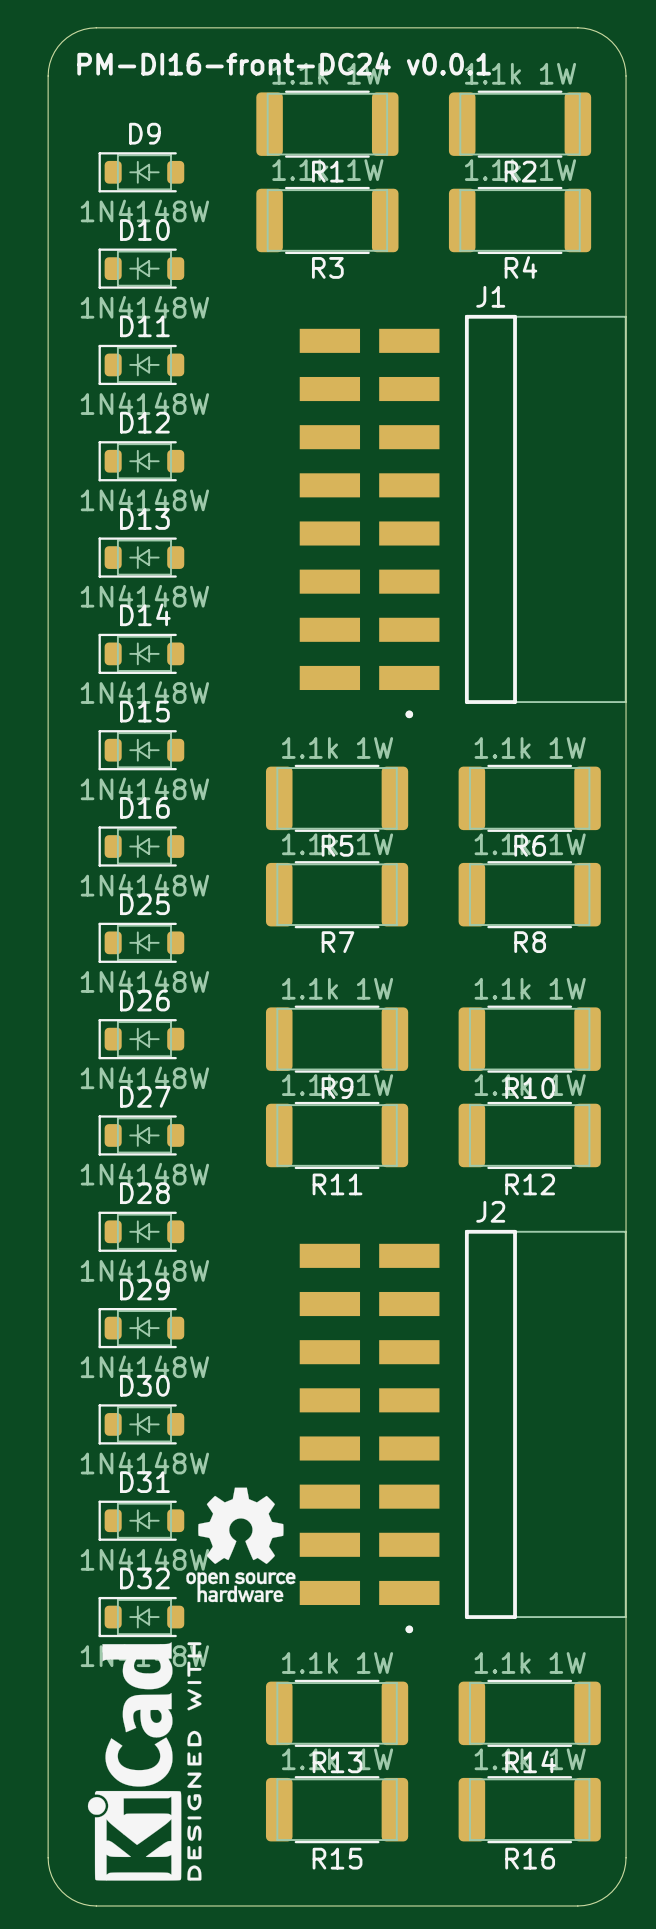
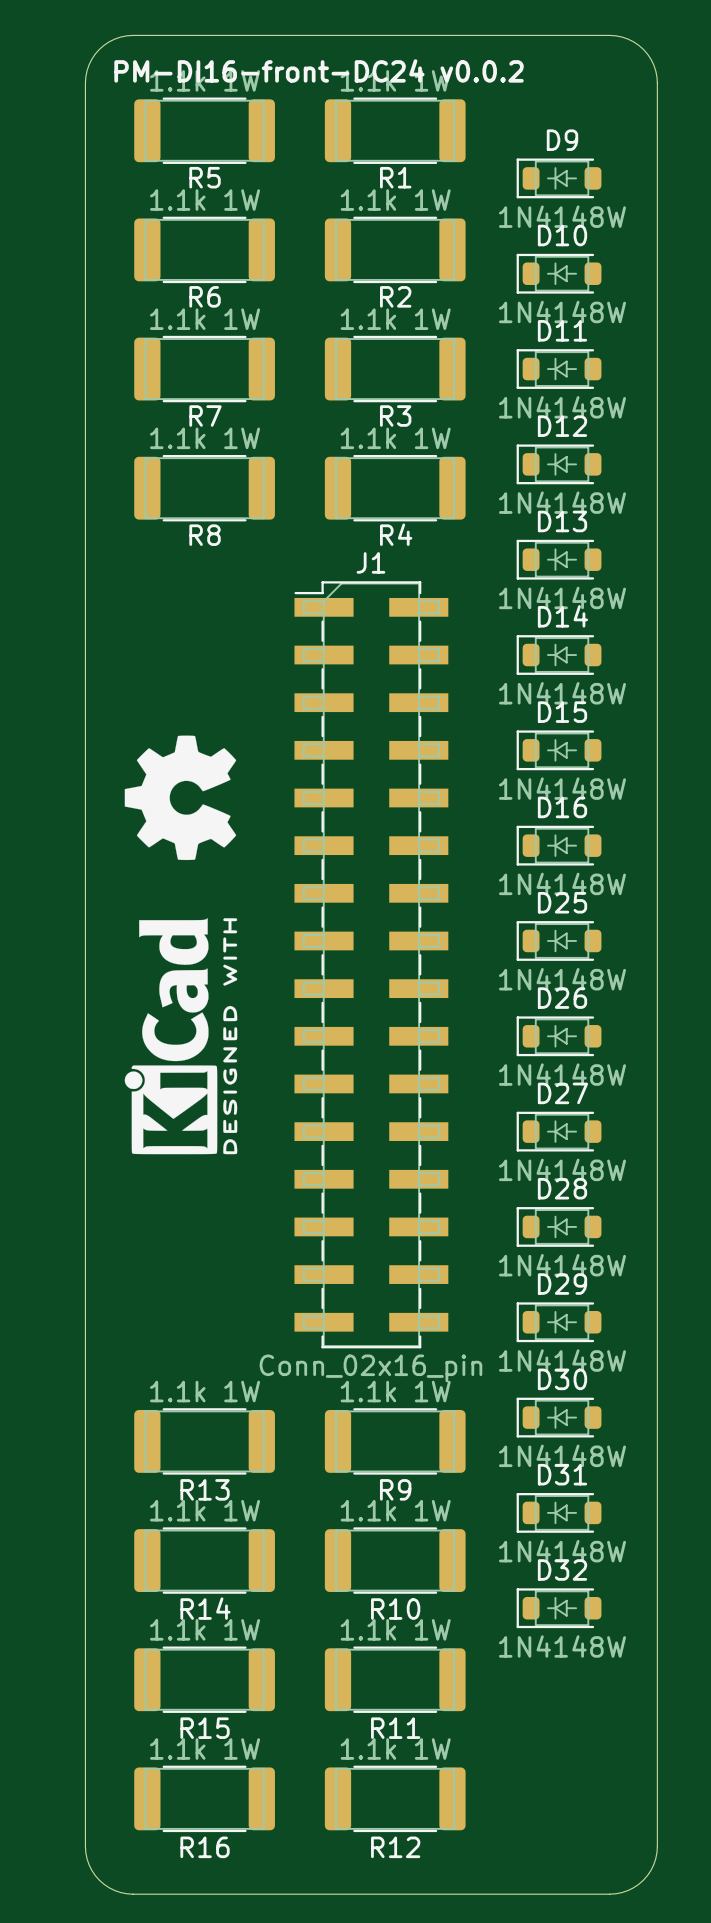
text: PM-DI16-front-DC24 v0.0.1 (284, 63) -> PM-DI16-front-DC24 v0.0.2 (319, 70)
R1 position: (327, 124) -> (395, 130)
R2 position: (520, 124) -> (395, 249)
D9 position: (141, 172) -> (559, 178)
R3 position: (327, 220) -> (395, 369)
R4 position: (520, 220) -> (395, 488)
D10 position: (141, 268) -> (559, 273)
J1 name position: J1 (490, 296) -> J1 (370, 562)
J1 footprint: [299, 314, 627, 719] -> [294, 581, 449, 1349]
D11 position: (141, 364) -> (559, 369)
D12 position: (141, 461) -> (559, 464)
D13 position: (141, 557) -> (559, 559)
D14 position: (141, 653) -> (559, 655)
drawing: none -> [124, 735, 237, 861]
D15 position: (141, 750) -> (559, 750)
R5 position: (337, 798) -> (204, 130)
R6 position: (529, 798) -> (204, 249)
D16 position: (141, 846) -> (559, 845)
R7 position: (337, 894) -> (204, 369)
R8 position: (529, 894) -> (204, 488)
drawing: none -> [124, 918, 238, 1155]
D25 position: (141, 942) -> (559, 940)
D26 position: (141, 1039) -> (559, 1036)
R9 position: (337, 1039) -> (395, 1441)
R10 position: (529, 1039) -> (395, 1560)
D27 position: (141, 1135) -> (559, 1131)
R11 position: (337, 1135) -> (395, 1679)
R12 position: (529, 1135) -> (395, 1798)
D28 position: (141, 1231) -> (559, 1226)
D29 position: (141, 1328) -> (559, 1322)
J1 value: none -> Conn_02x16_pin (370, 1368)
D30 position: (141, 1424) -> (559, 1417)
J2: (463, 1431) -> none
drawing: [186, 1487, 296, 1603] -> none
D31 position: (141, 1520) -> (559, 1512)
D32 position: (141, 1617) -> (559, 1608)
drawing: [87, 1642, 202, 1881] -> none
R13 position: (337, 1713) -> (204, 1441)
R14 position: (529, 1713) -> (204, 1560)
R15 position: (337, 1809) -> (204, 1679)
R16 position: (529, 1809) -> (204, 1798)

